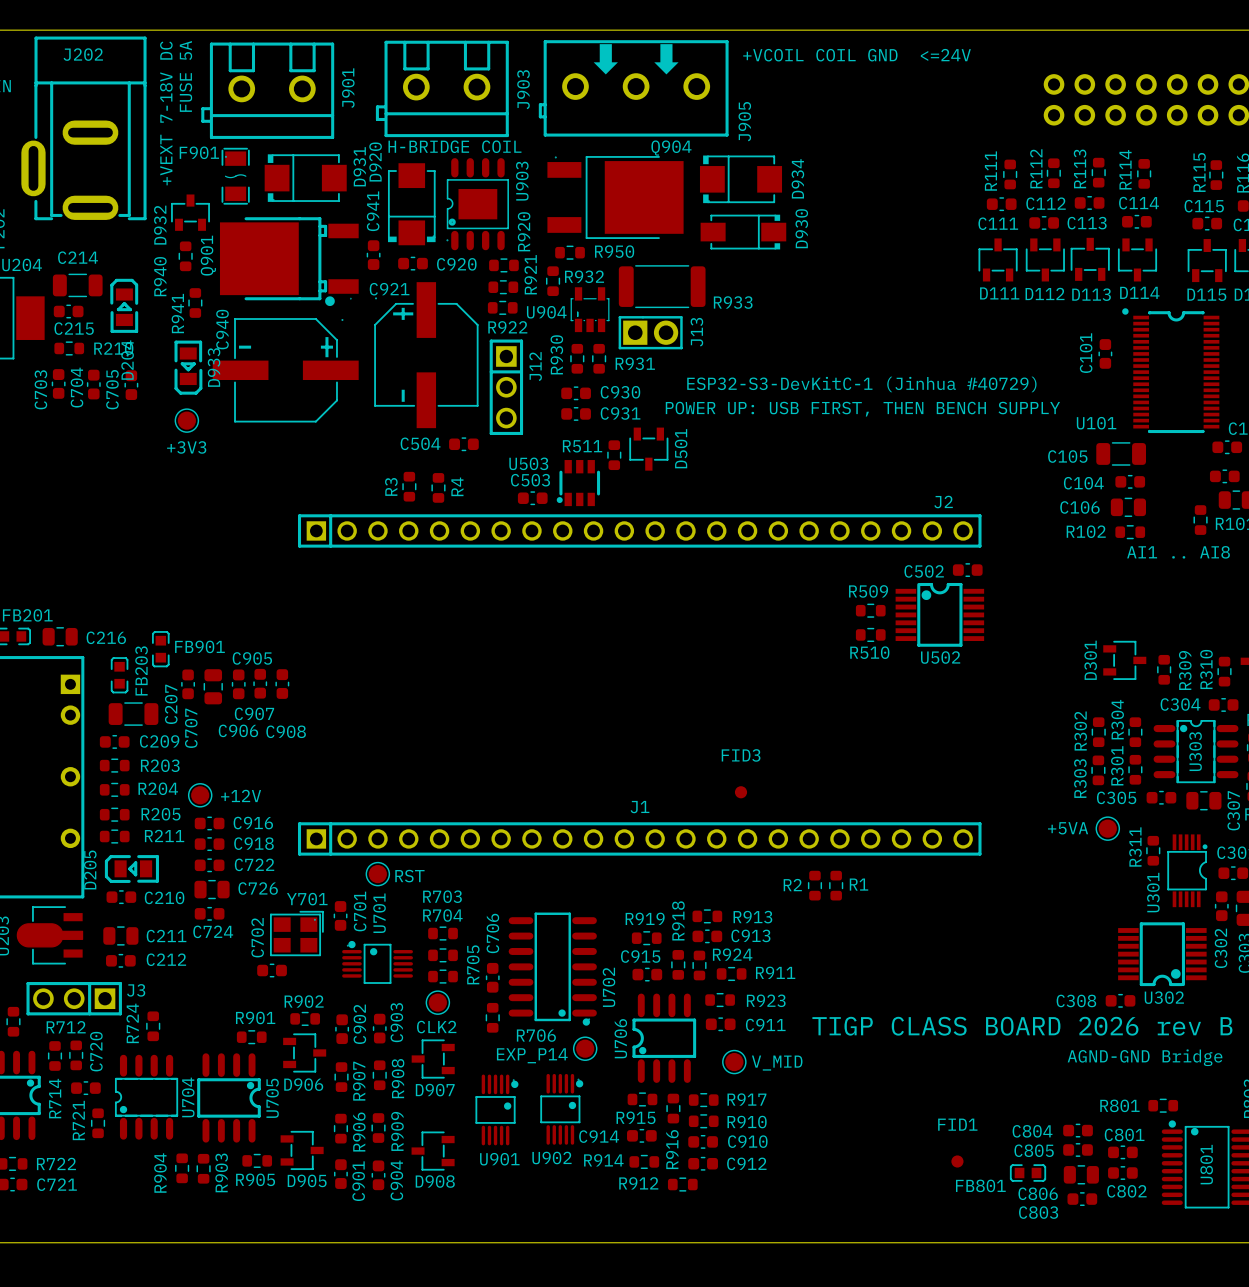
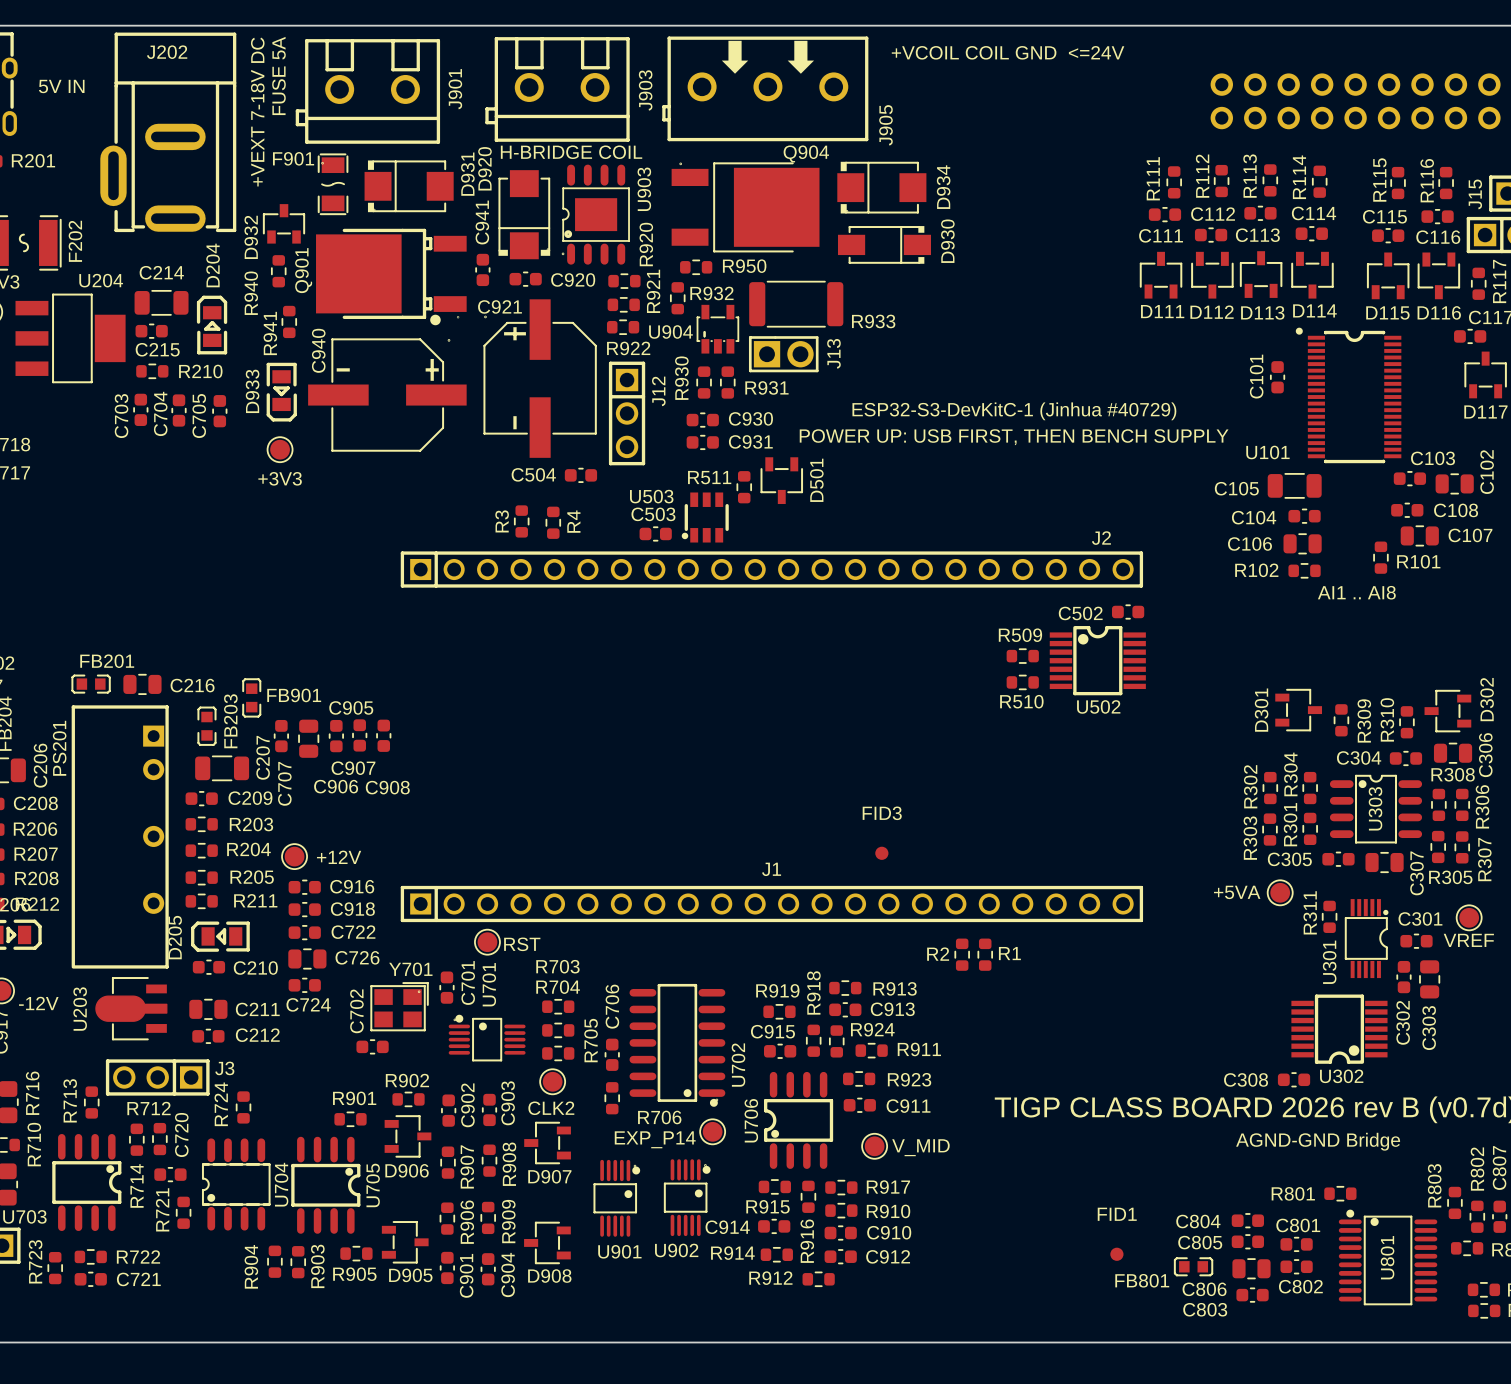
D204 name position: D204 (127, 360) -> D204 (213, 265)
D933 name position: D933 (214, 367) -> D933 (252, 391)

